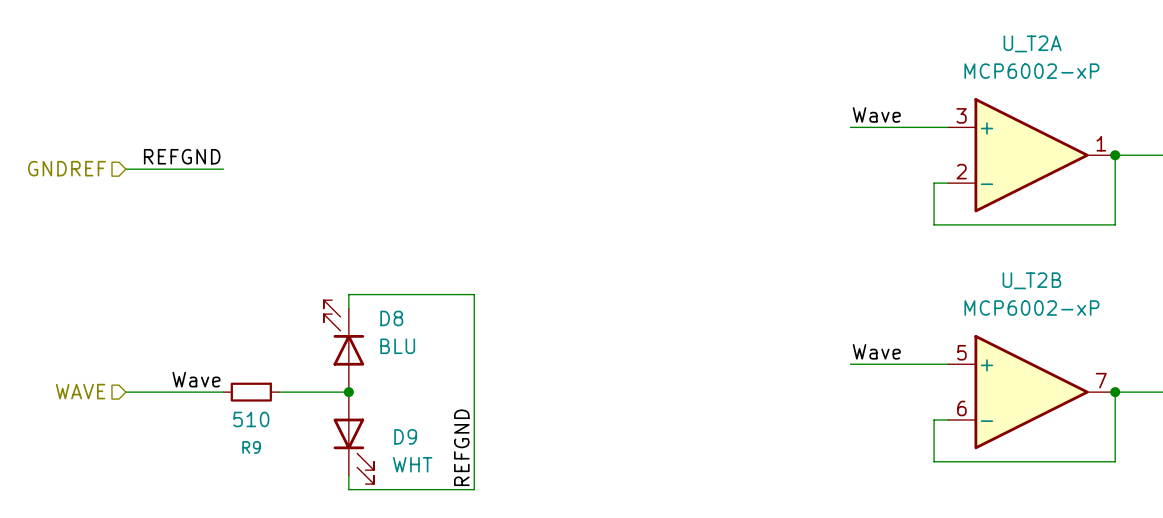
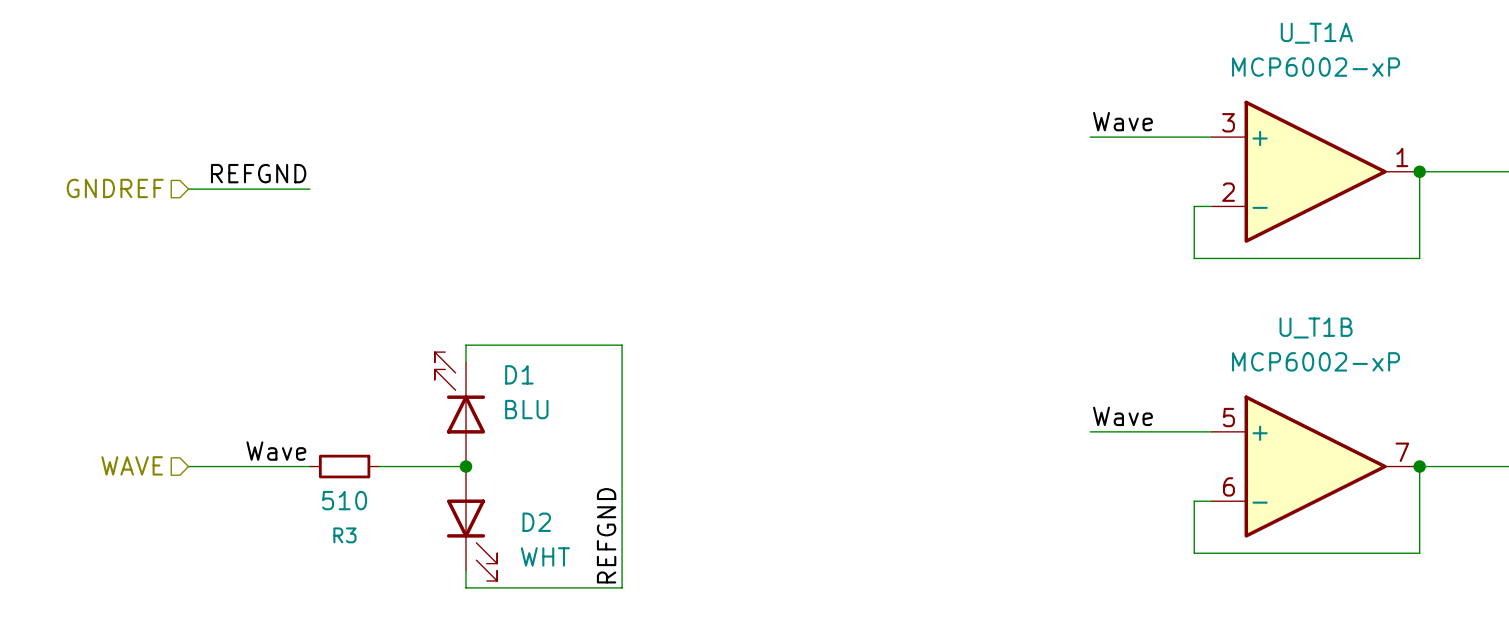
U_T2A name: U_T2A (1032, 43) -> U_T1A (1316, 33)
U_T2B name: U_T2B (1031, 280) -> U_T1B (1316, 328)
D8 name: D8 (391, 318) -> D1 (519, 374)
D9 name: D9 (405, 436) -> D2 (536, 522)
R9 name: R9 (251, 447) -> R3 (344, 535)

